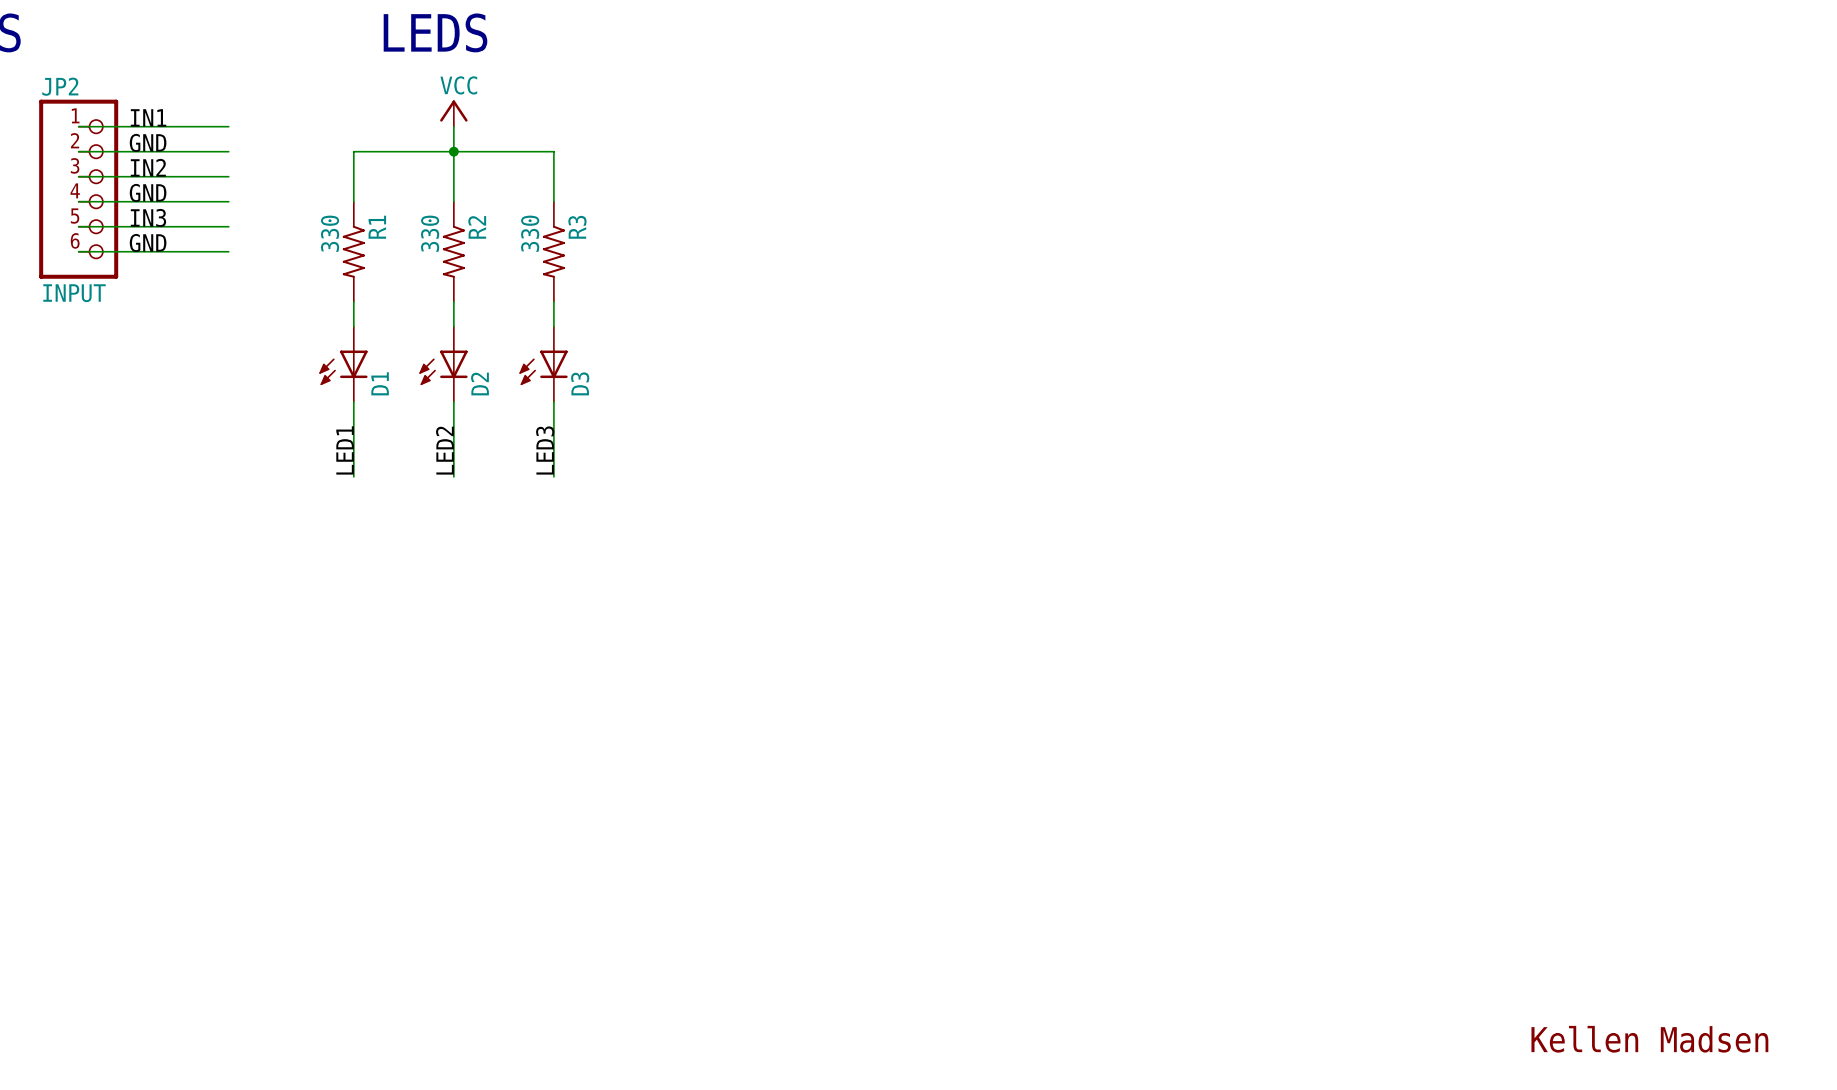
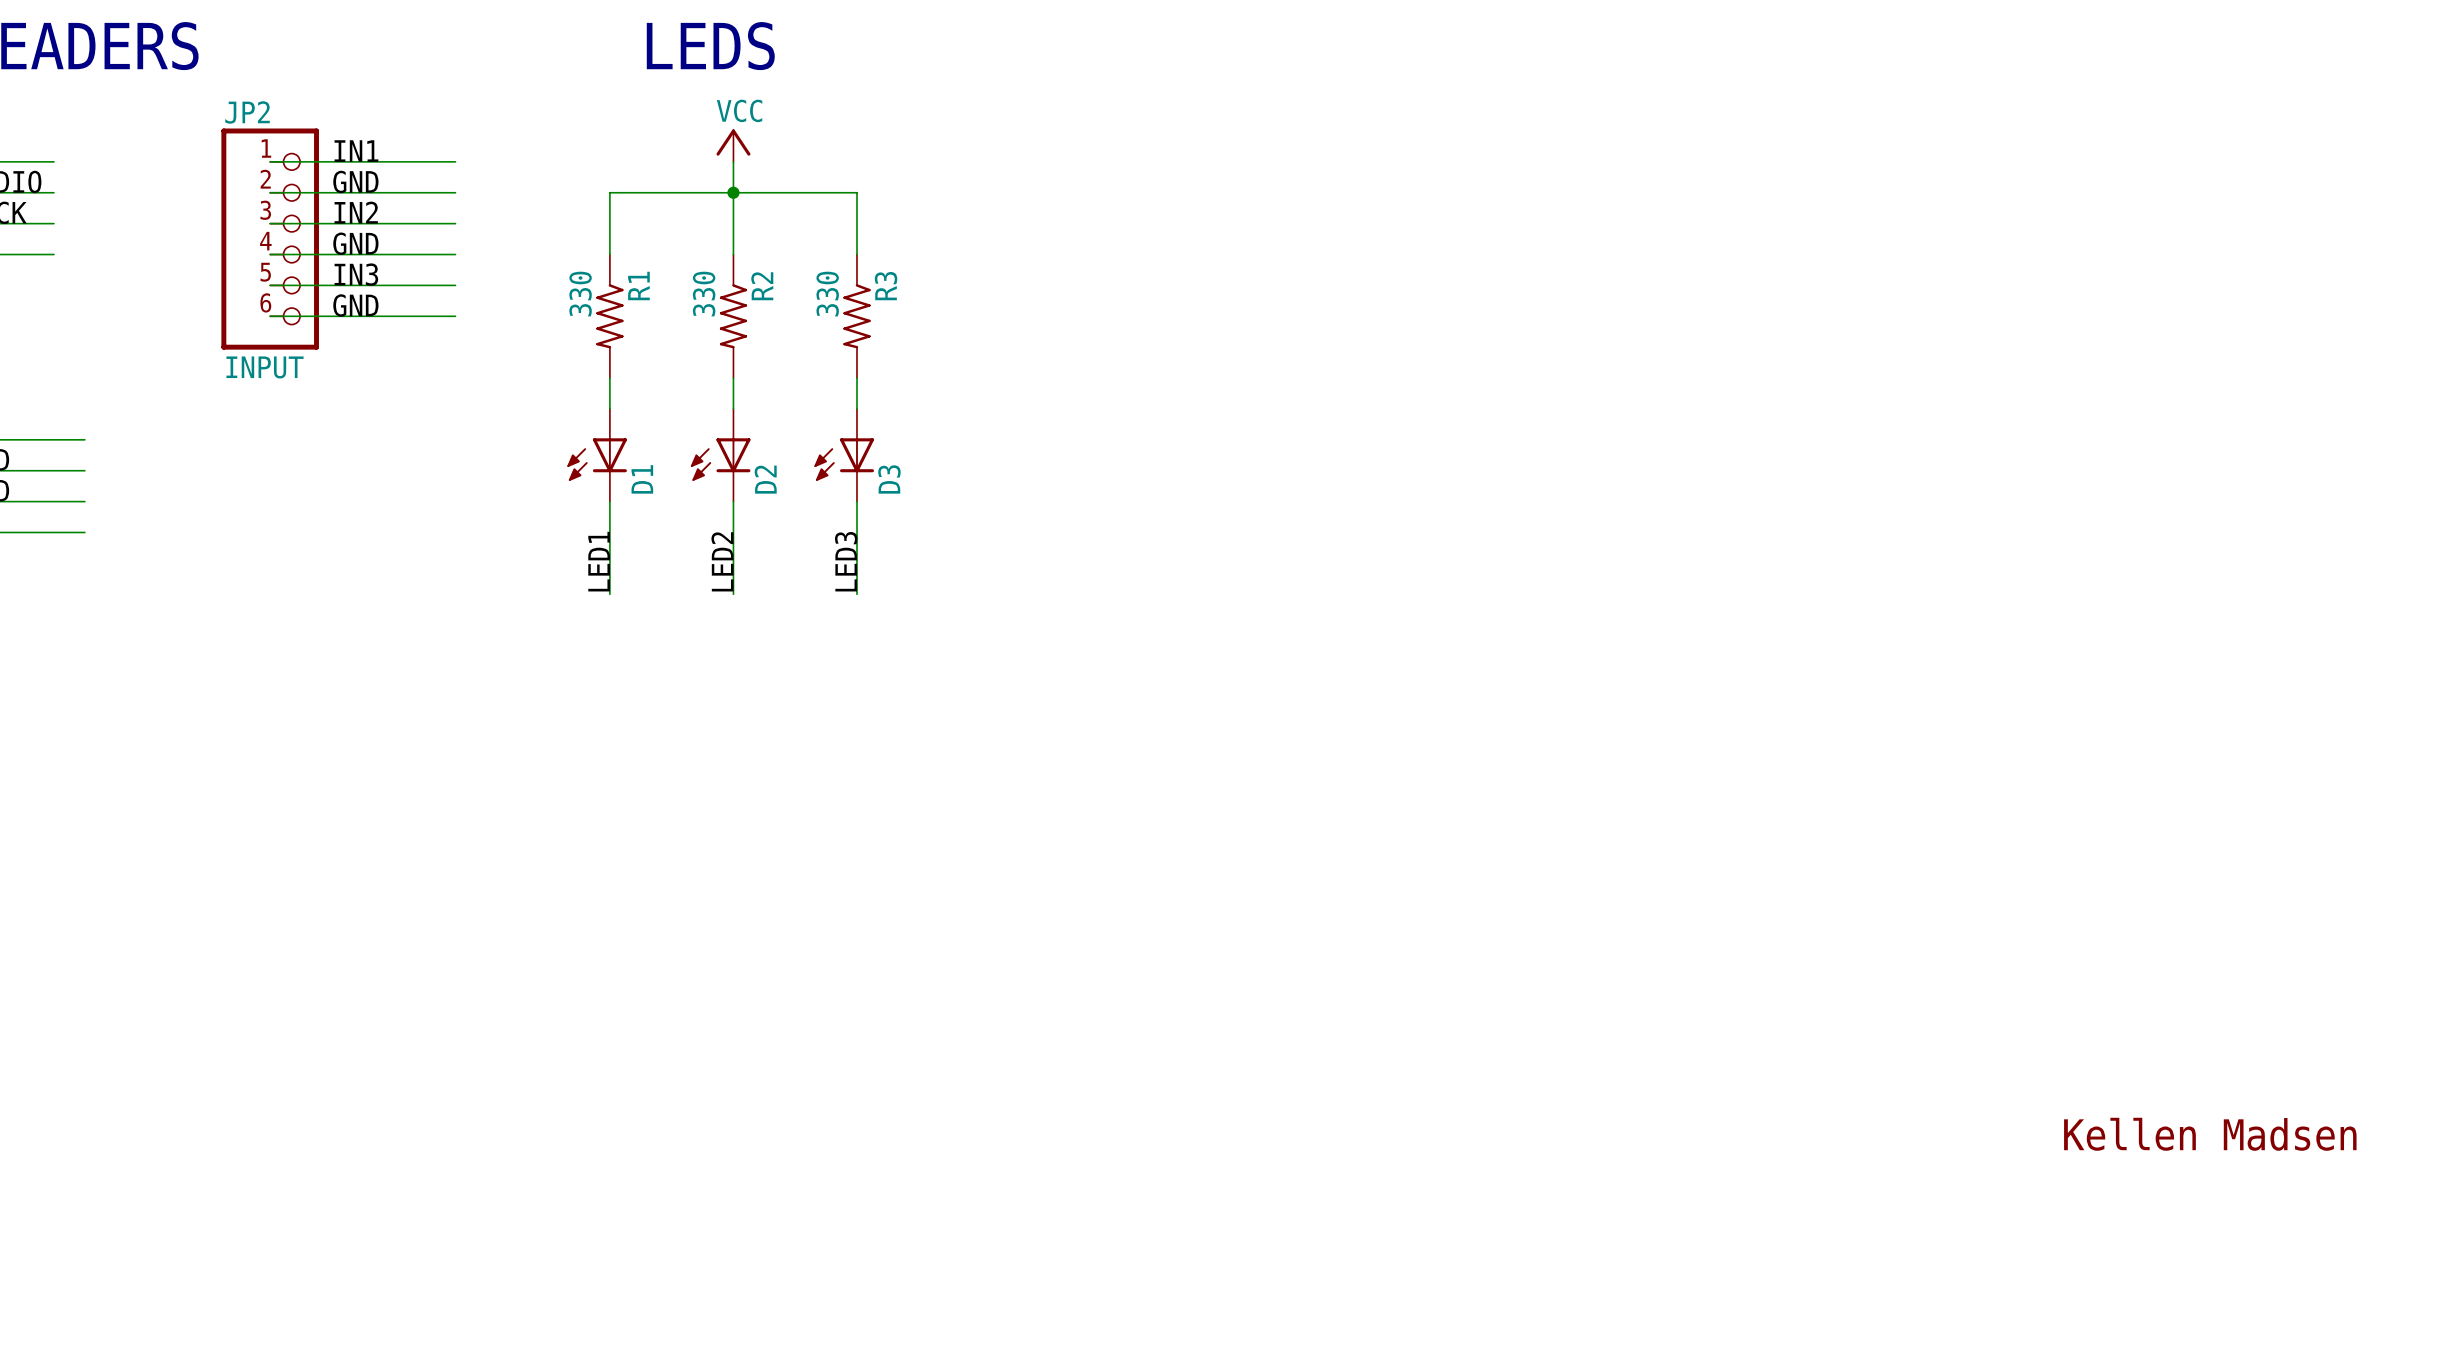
text position: Kellen Madsen (1649, 1039) -> Kellen Madsen (2210, 1134)

